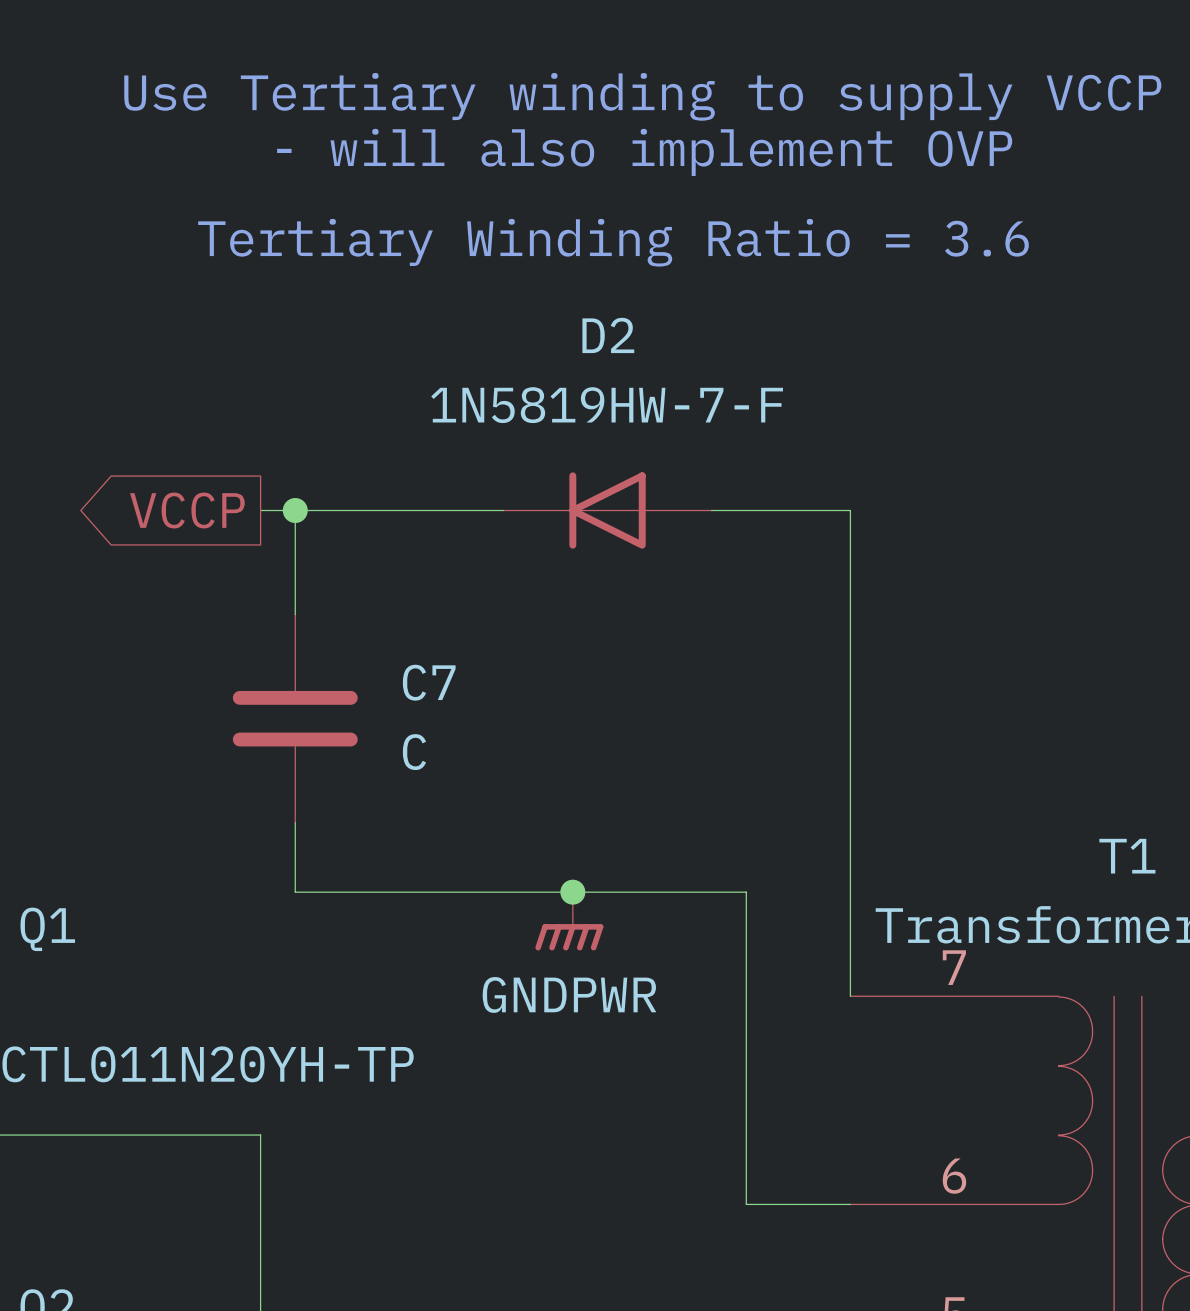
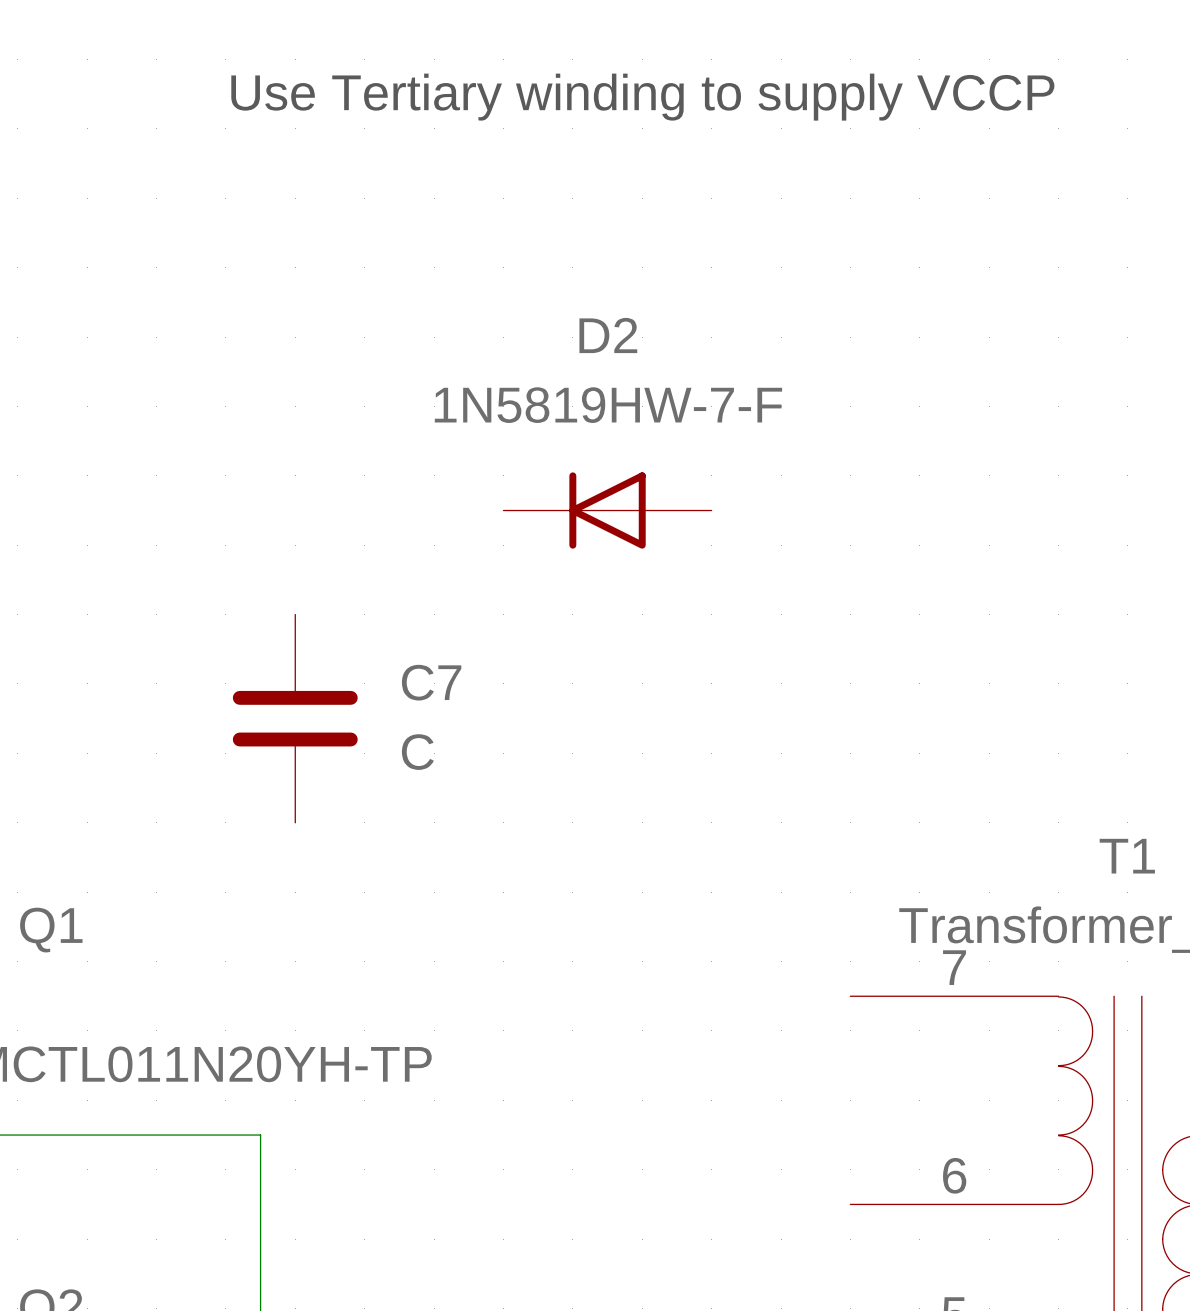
text: - will also implement OVP (644, 152) -> none
text: Tertiary Winding Ratio = 3.6 (613, 242) -> none
global label: VCCP (187, 510) -> none
wire: (260, 510) (503, 510) -> none
wire: (295, 510) (295, 614) -> none
junction: (295, 510) -> none
wire: (711, 510) (850, 510) (850, 996) -> none
wire: (295, 822) (295, 892) (746, 892) (746, 1204) (850, 1204) -> none
junction: (572, 892) -> none
power symbol: GNDPWR (569, 921) -> none

